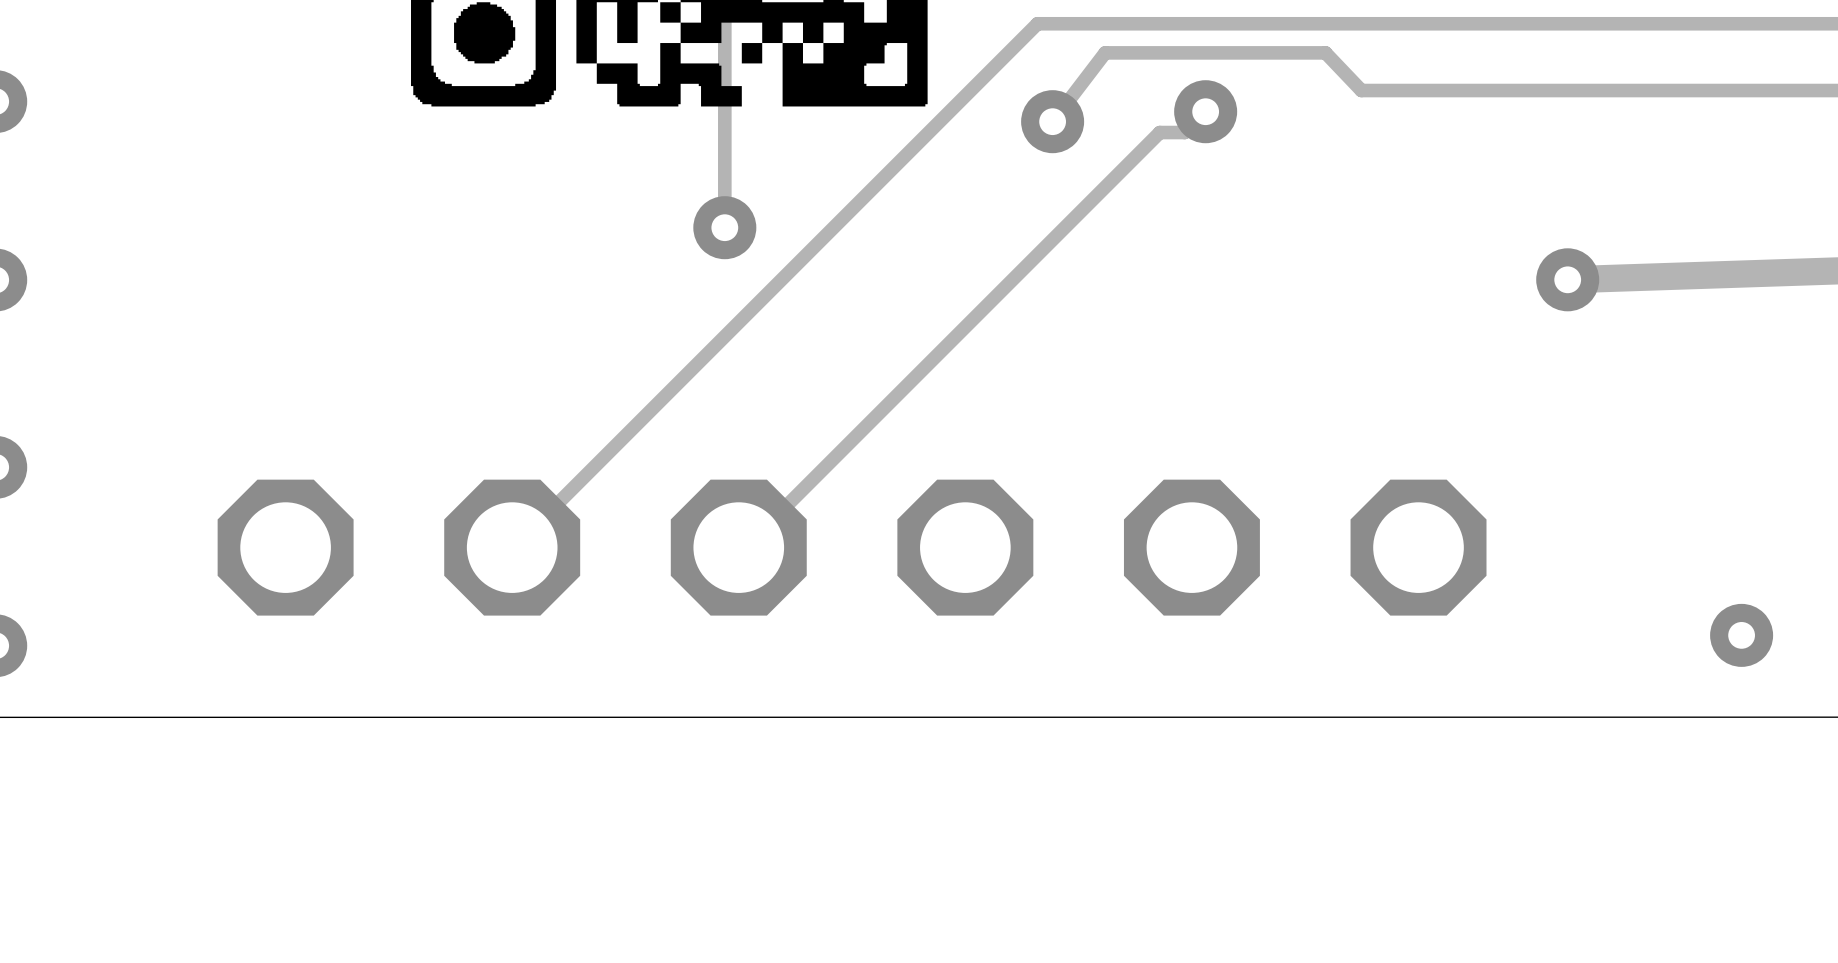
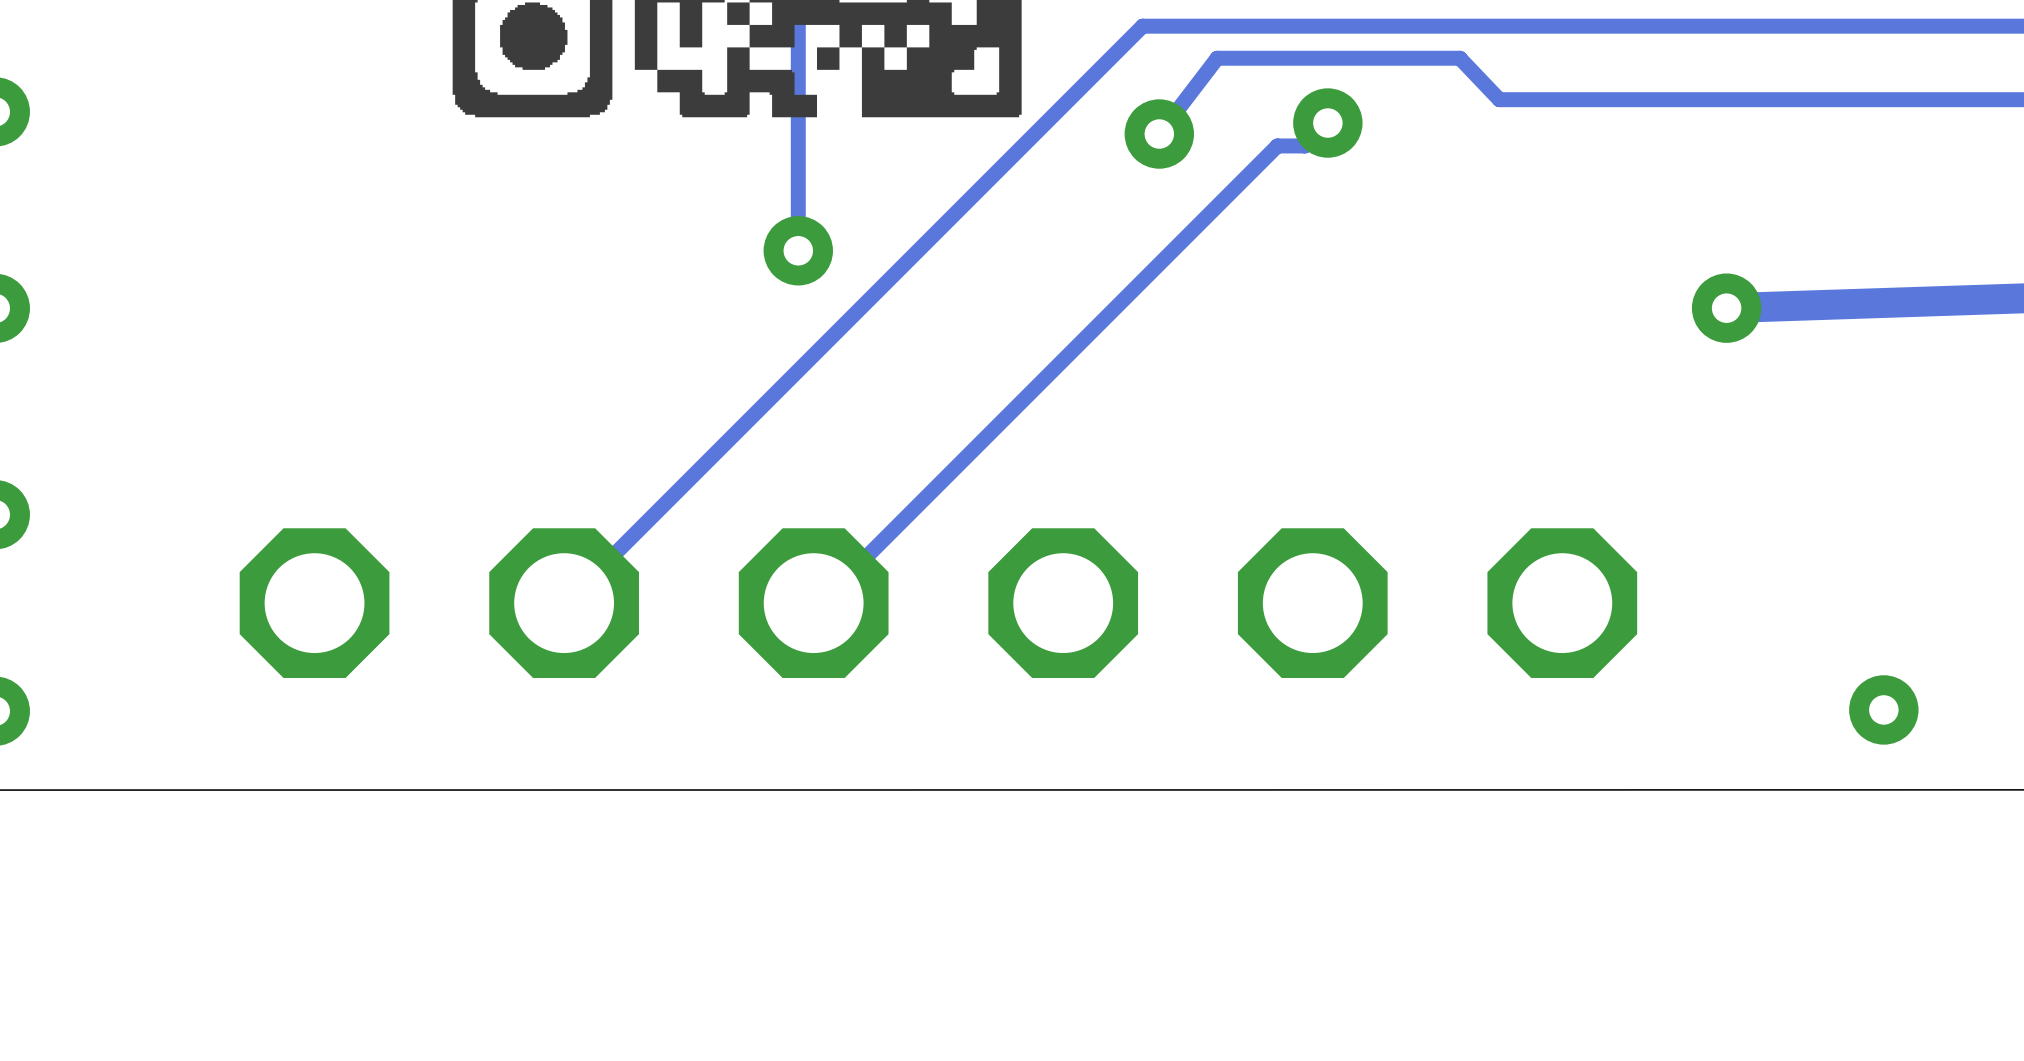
via position: (1741, 635) -> (1883, 709)

